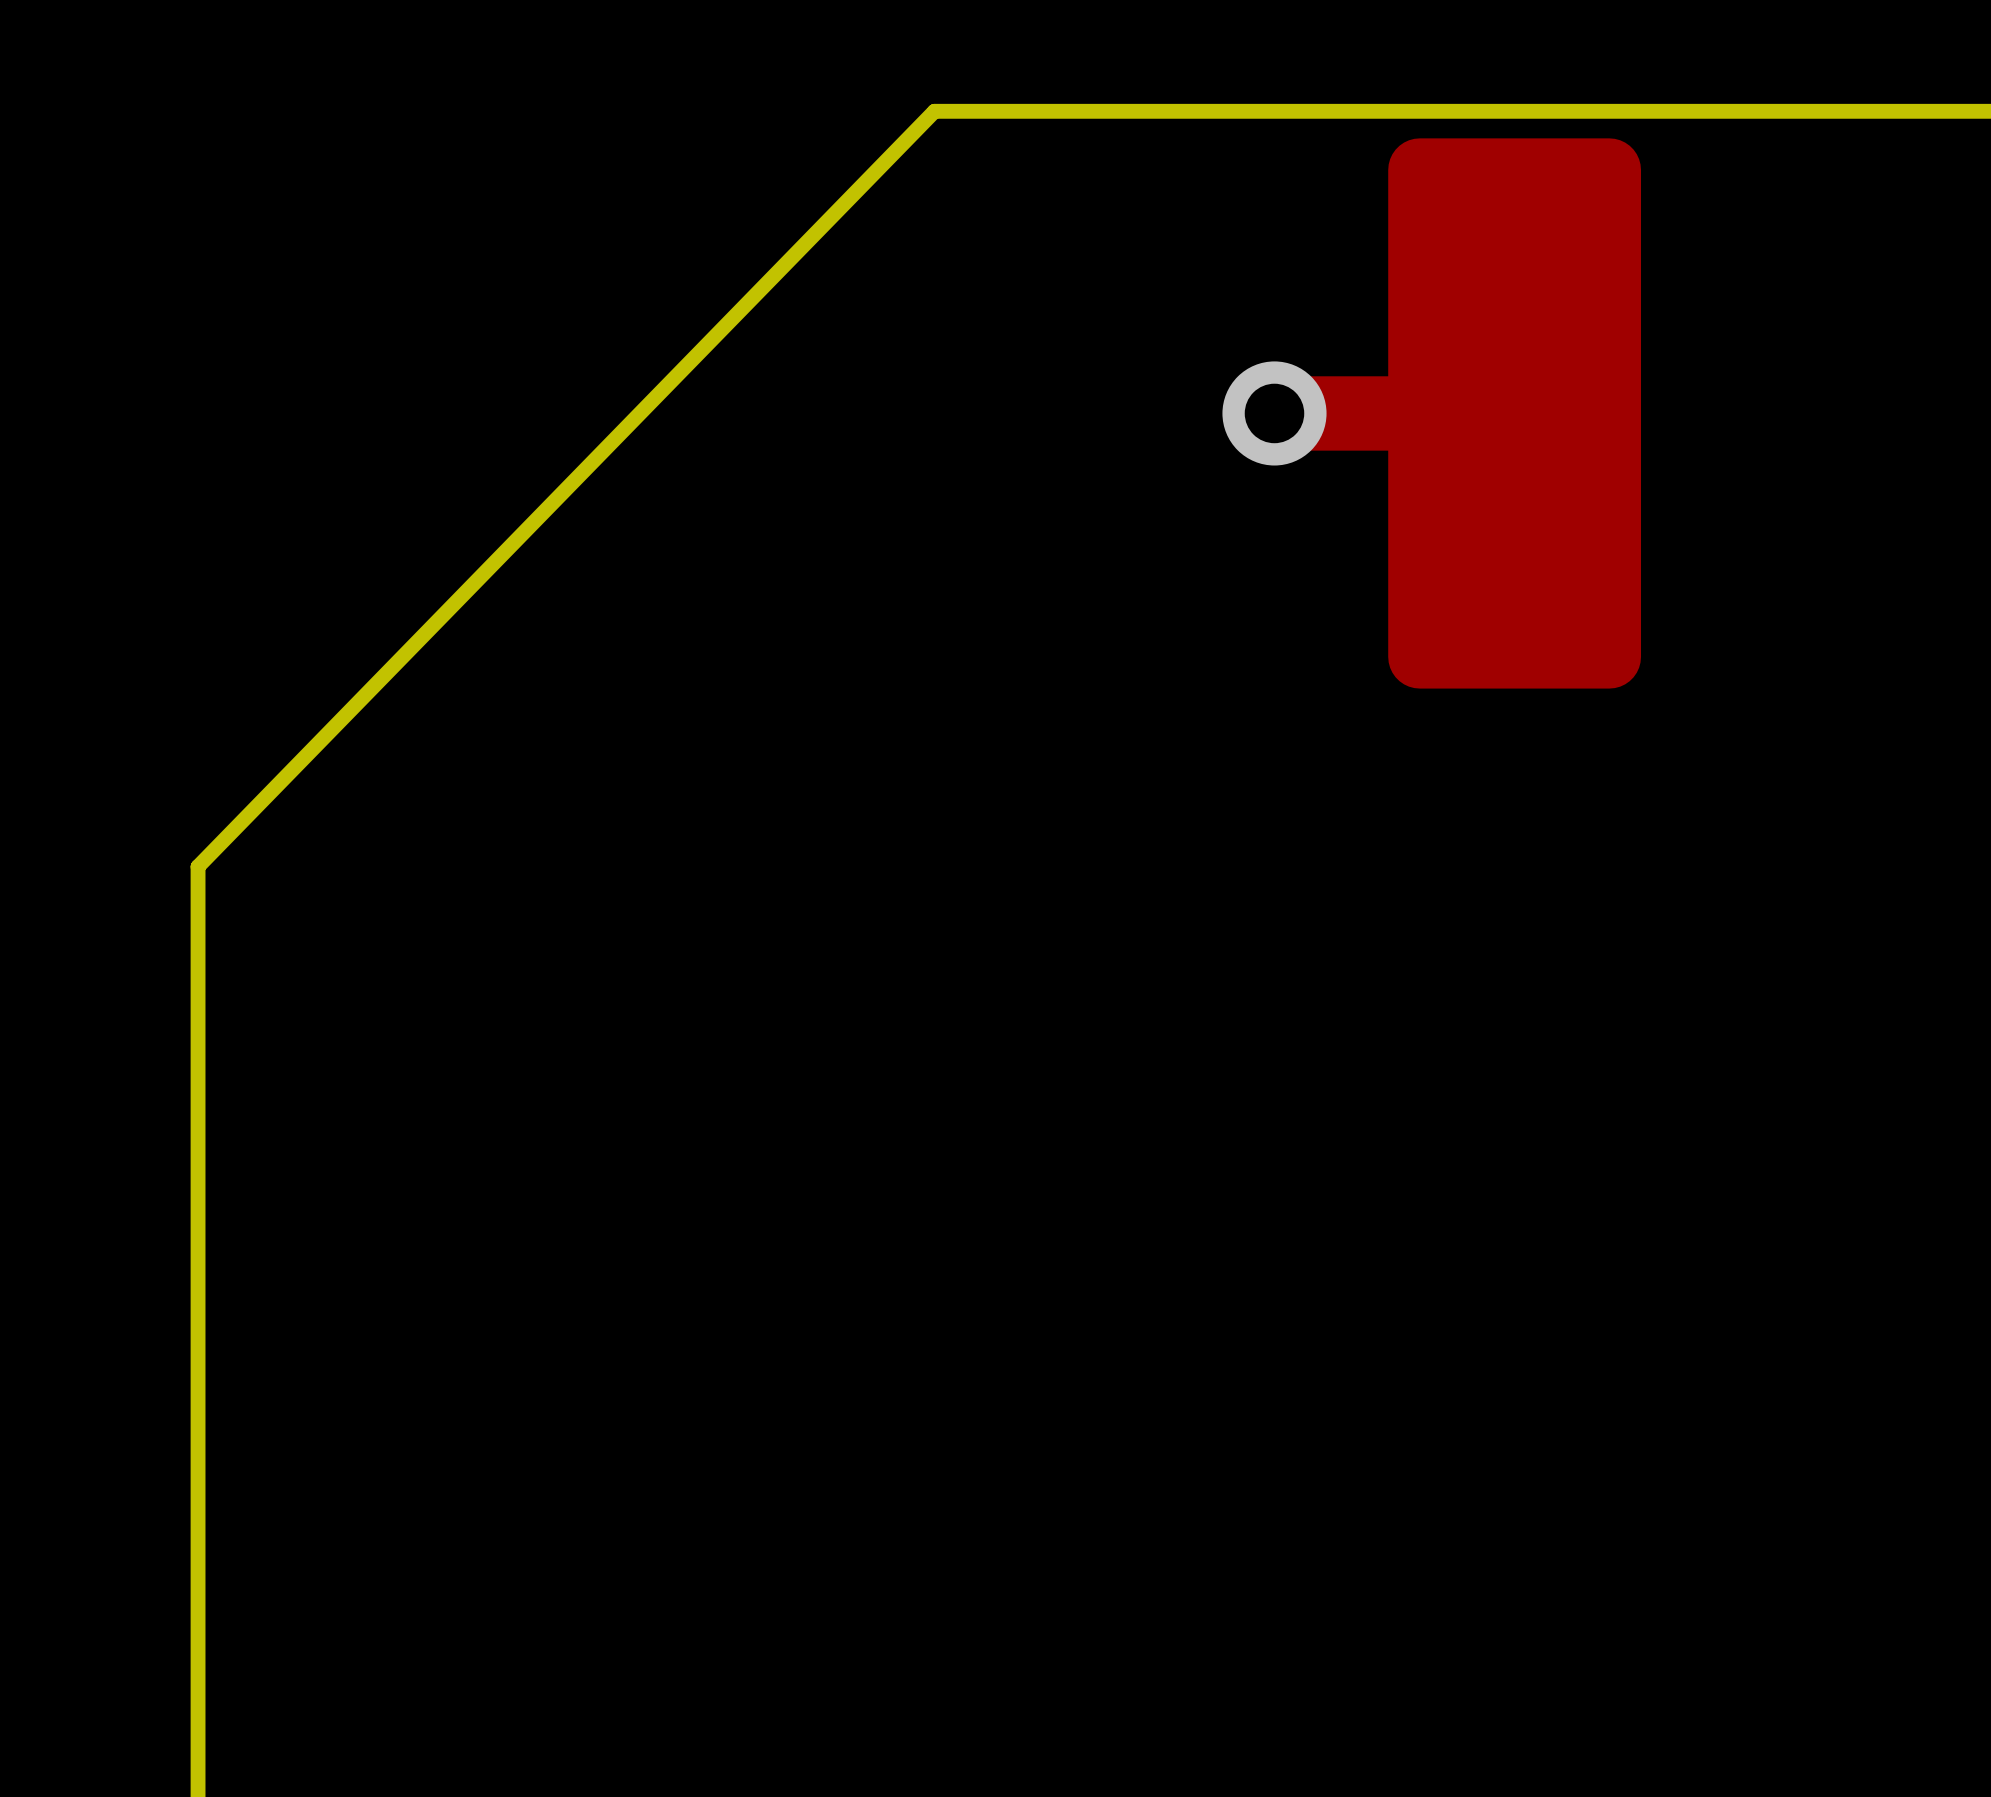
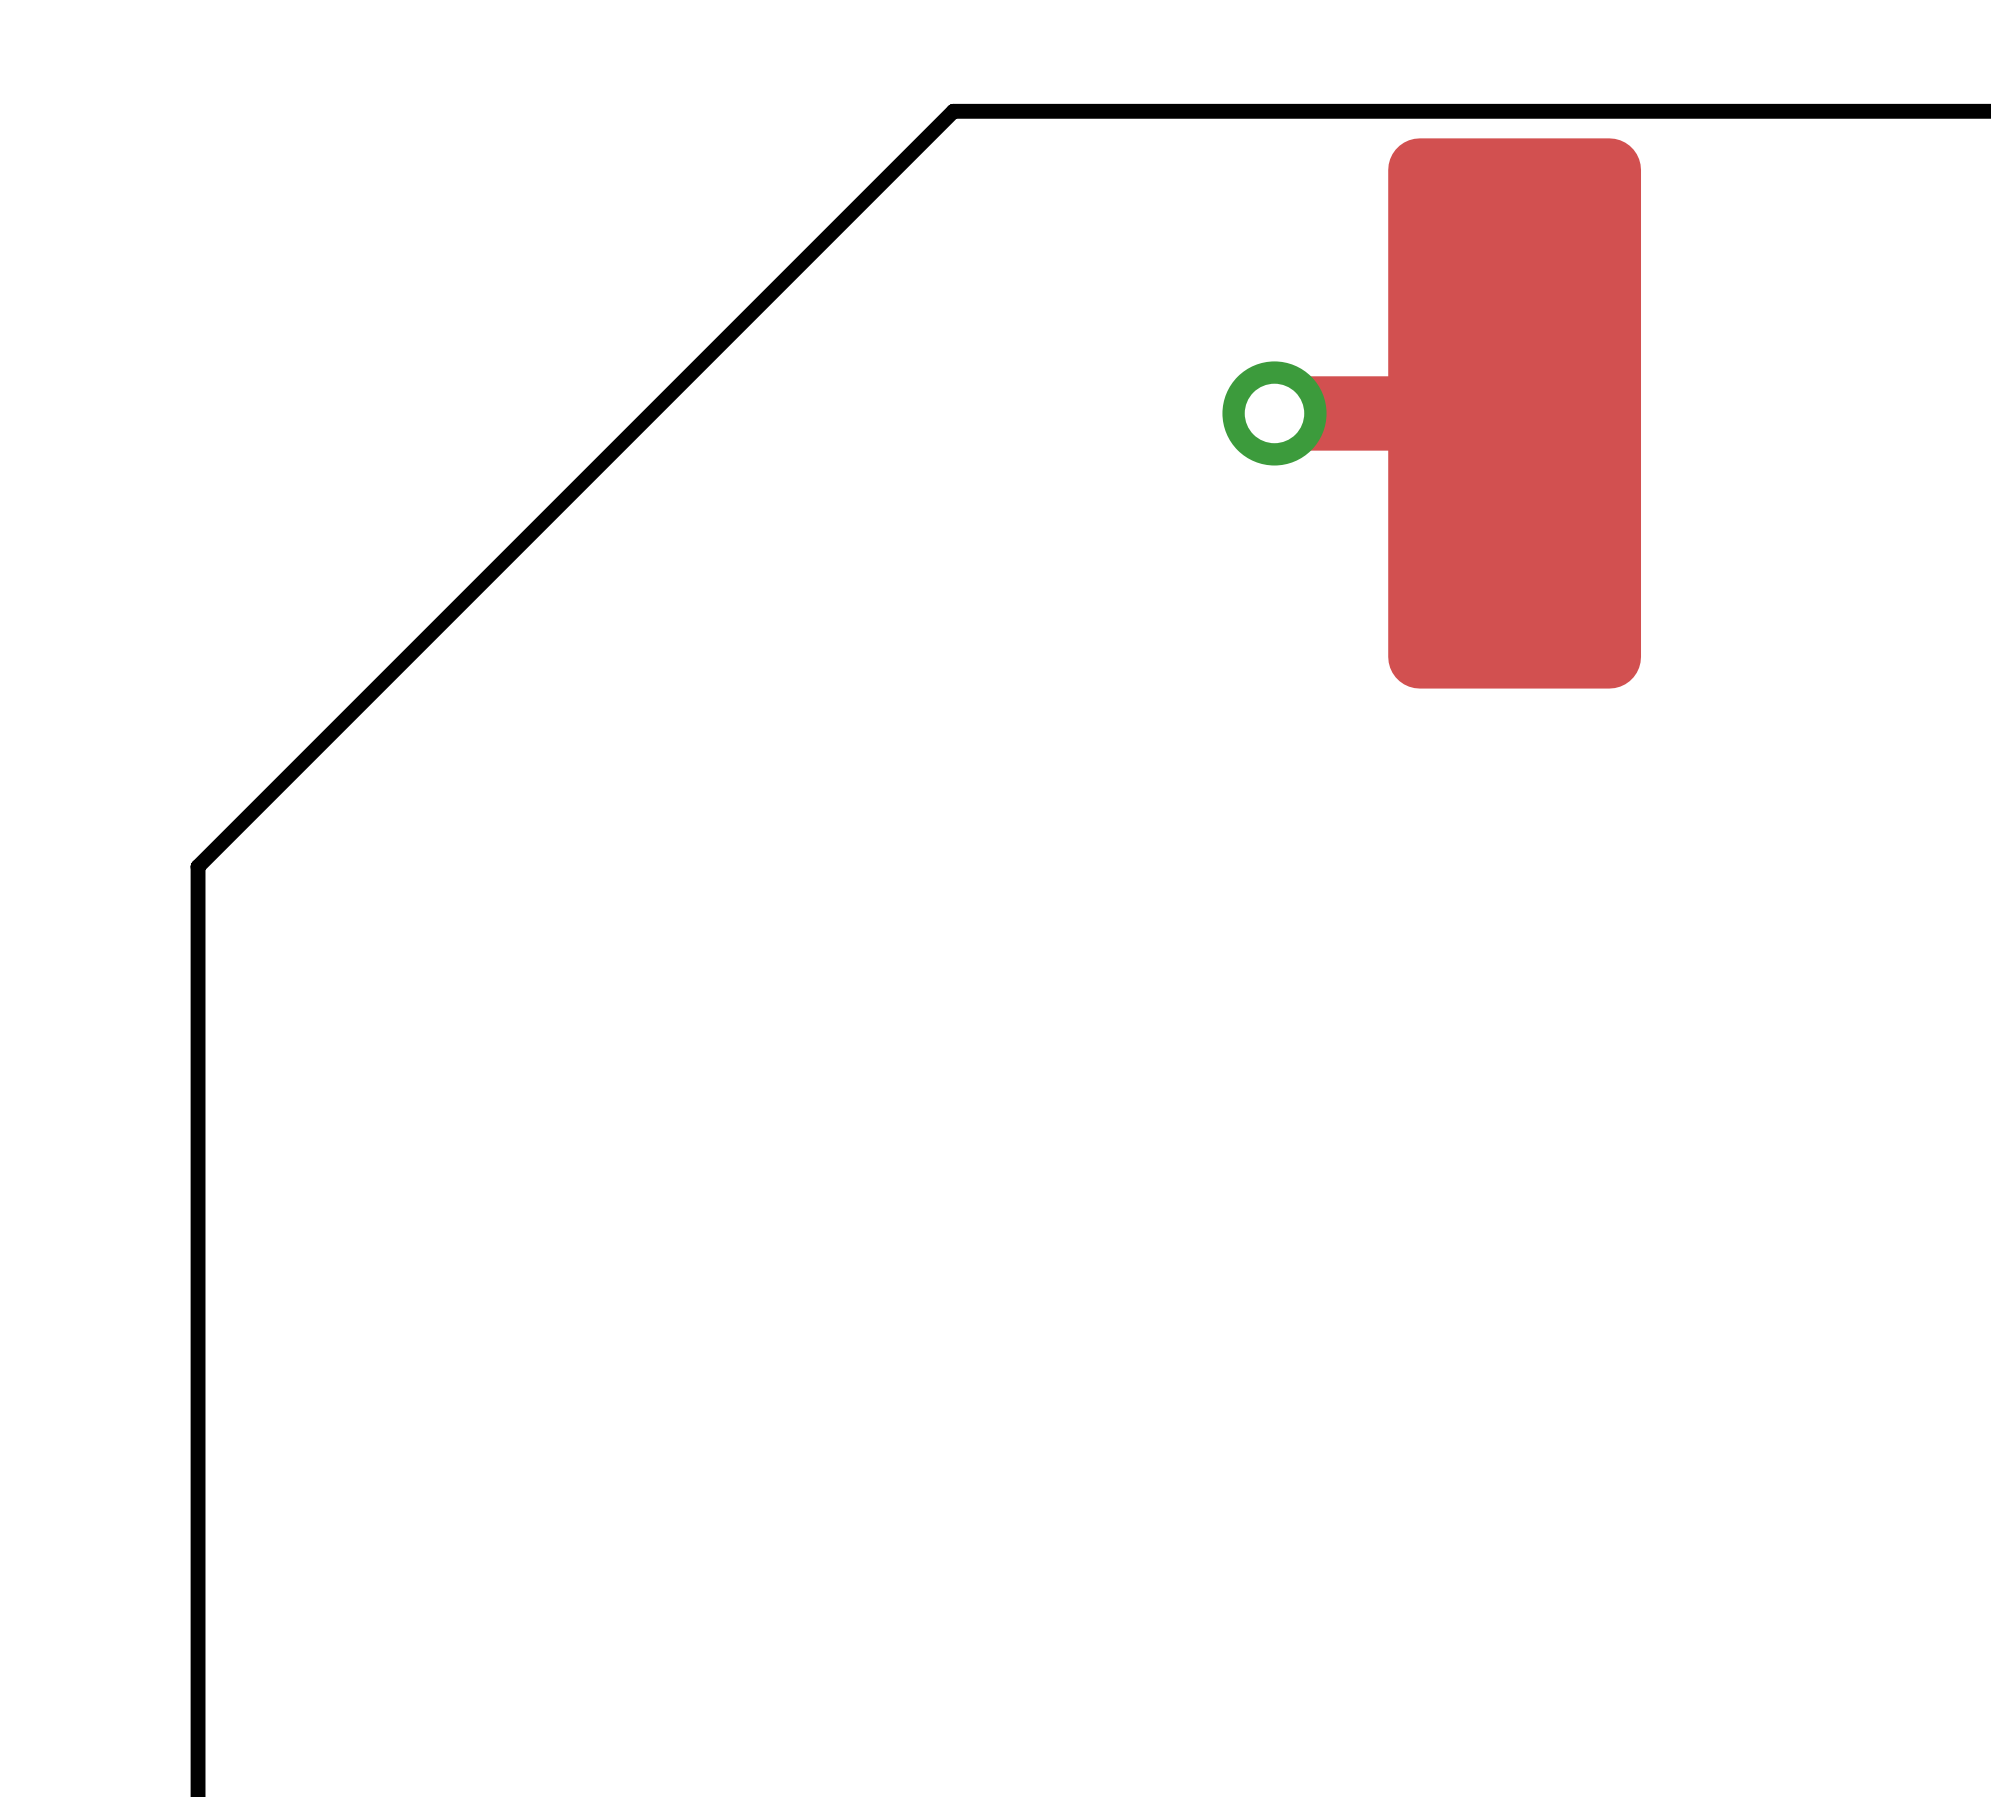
board edge: (953, 111) (934, 111) (198, 866) -> (953, 111) (198, 866)

